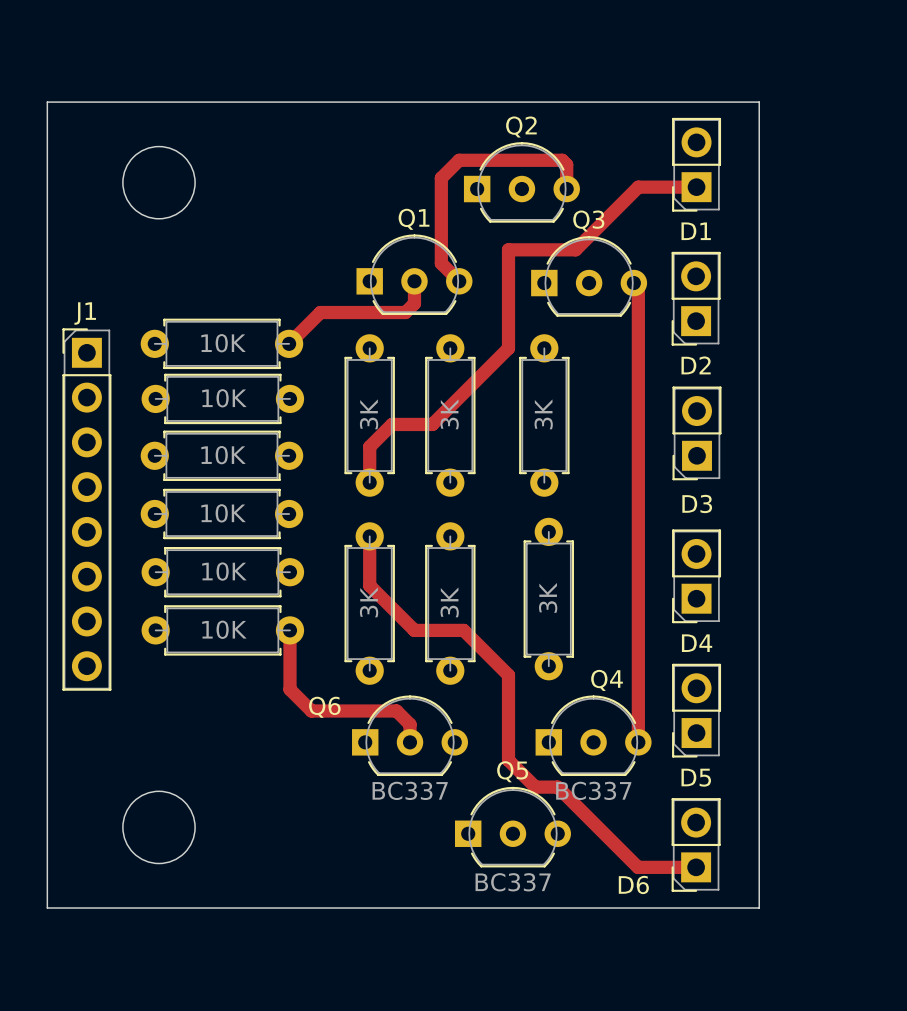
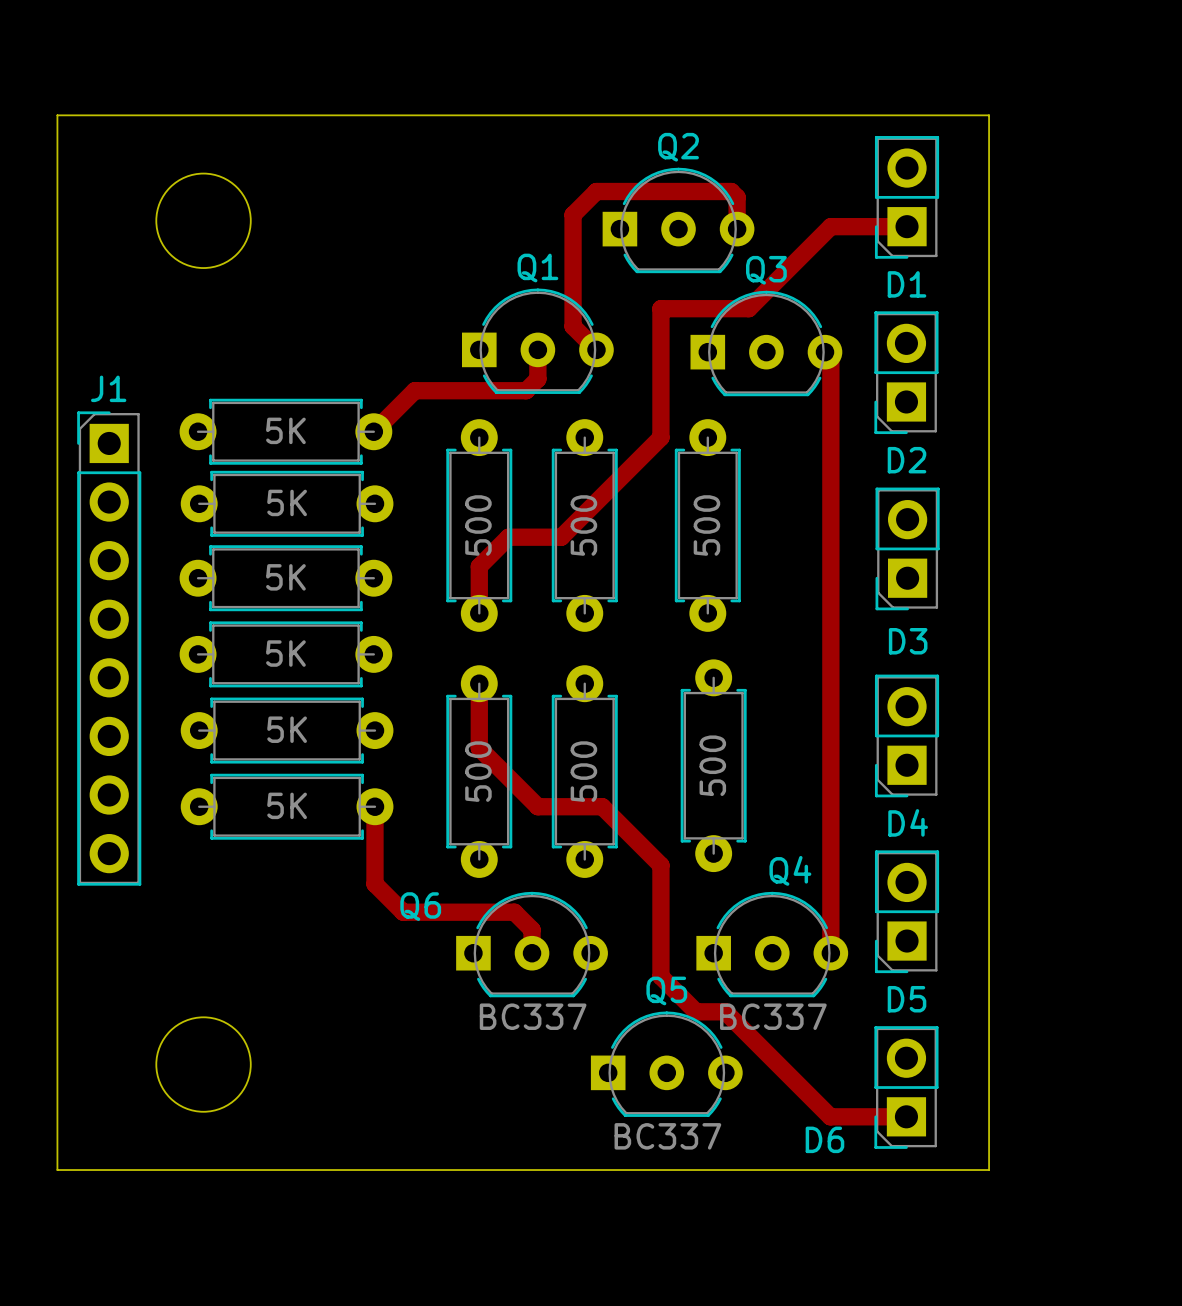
part value: 10K (223, 343) -> 5K (285, 430)
part value: 10K (224, 398) -> 5K (287, 502)
part value: 3K (369, 414) -> 500 (478, 525)
part value: 3K (449, 414) -> 500 (583, 525)
part value: 3K (543, 414) -> 500 (706, 525)
part value: 10K (223, 455) -> 5K (285, 577)
part value: 10K (223, 513) -> 5K (285, 653)
part value: 10K (224, 571) -> 5K (287, 729)
part value: 3K (548, 597) -> 500 (712, 765)
part value: 3K (369, 602) -> 500 (478, 771)
part value: 3K (449, 602) -> 500 (583, 771)
part value: 10K (224, 629) -> 5K (287, 805)

